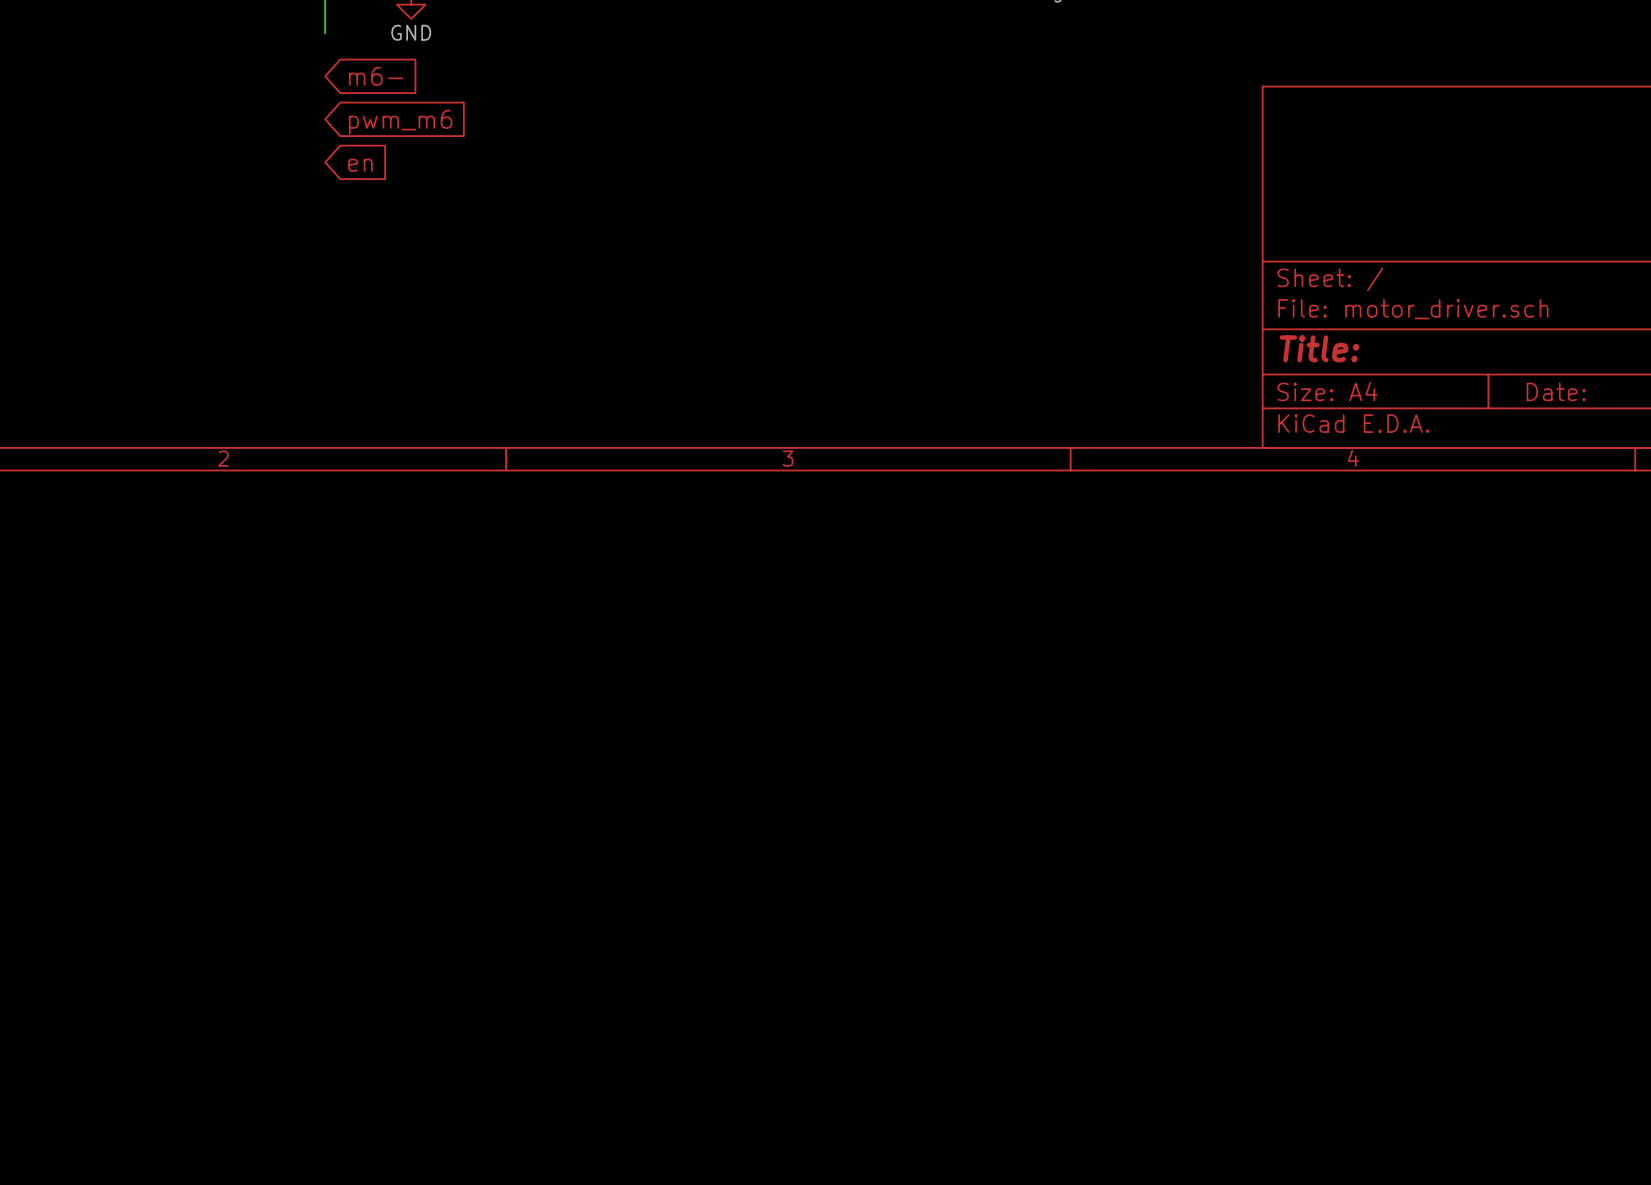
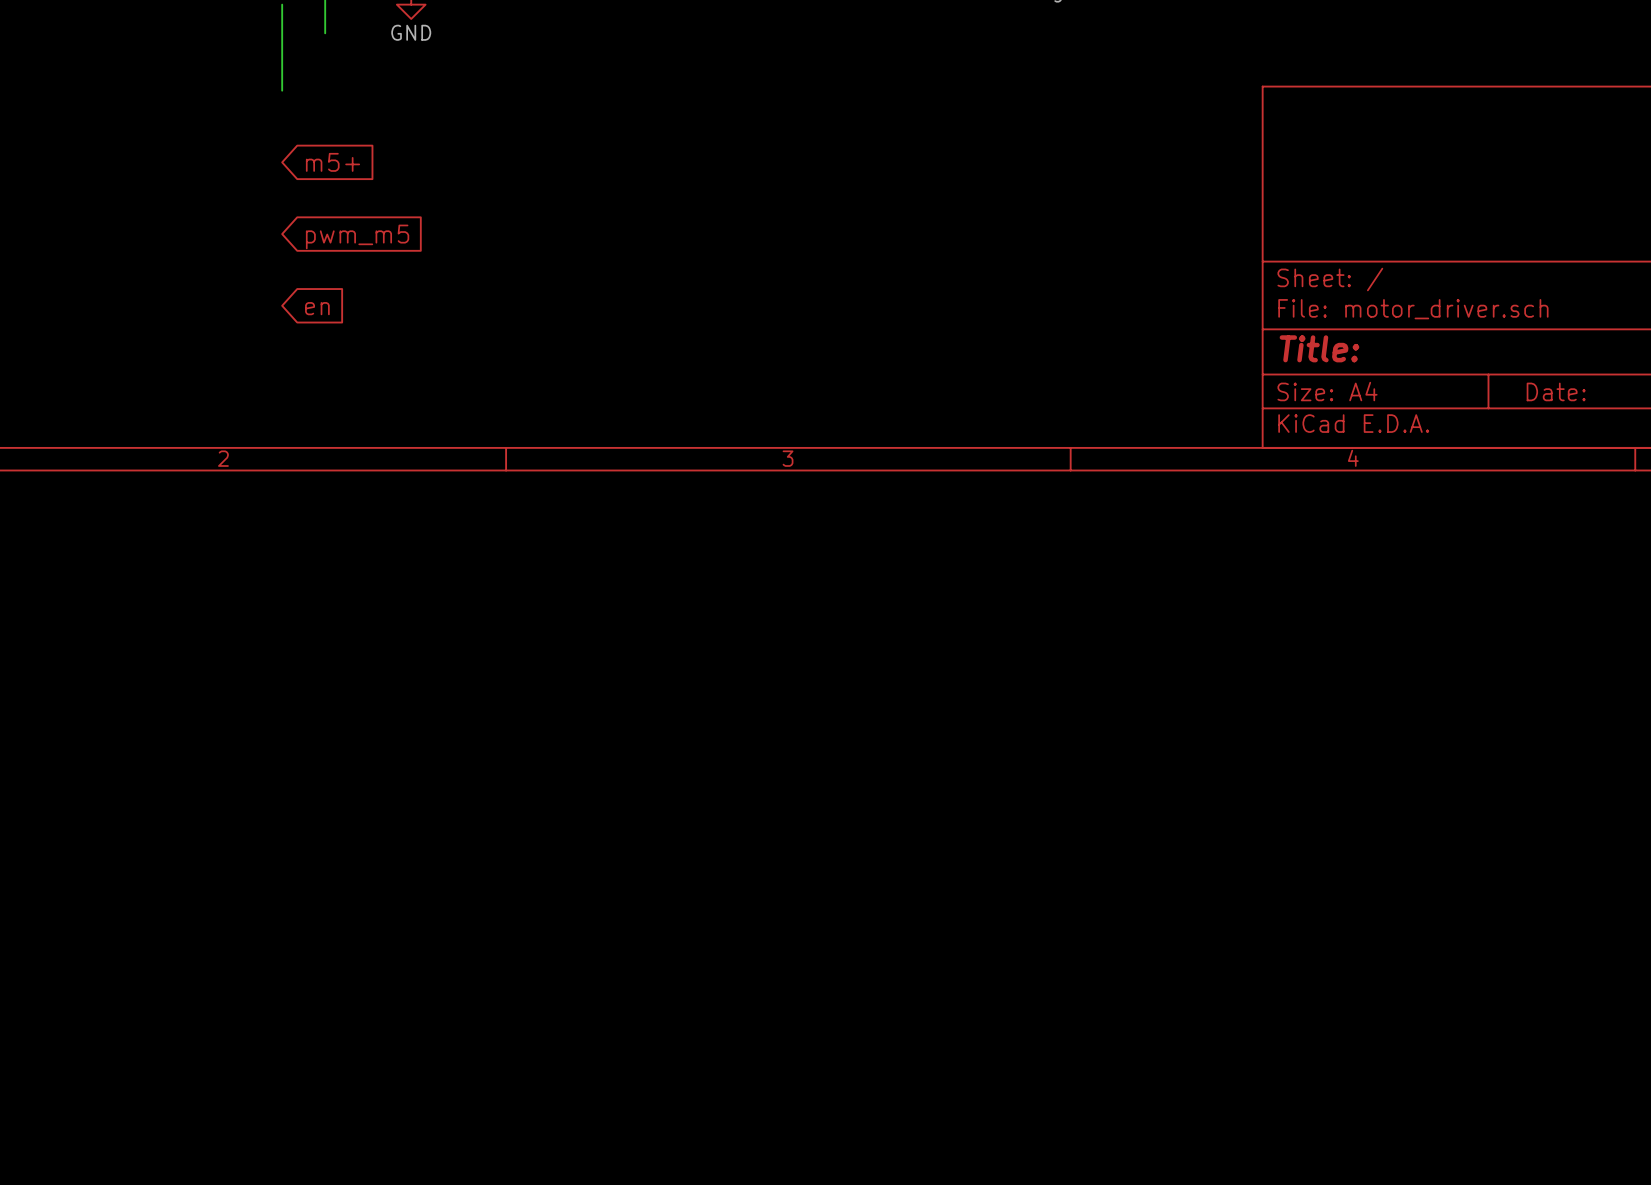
wire: none -> (282, 4) (282, 90)
global label: m6- (376, 76) -> none
global label: pwm_m6 (400, 122) -> none
global label: none -> m5+ (332, 162)
global label position: en (360, 165) -> en (317, 308)
global label: none -> pwm_m5 (357, 236)

